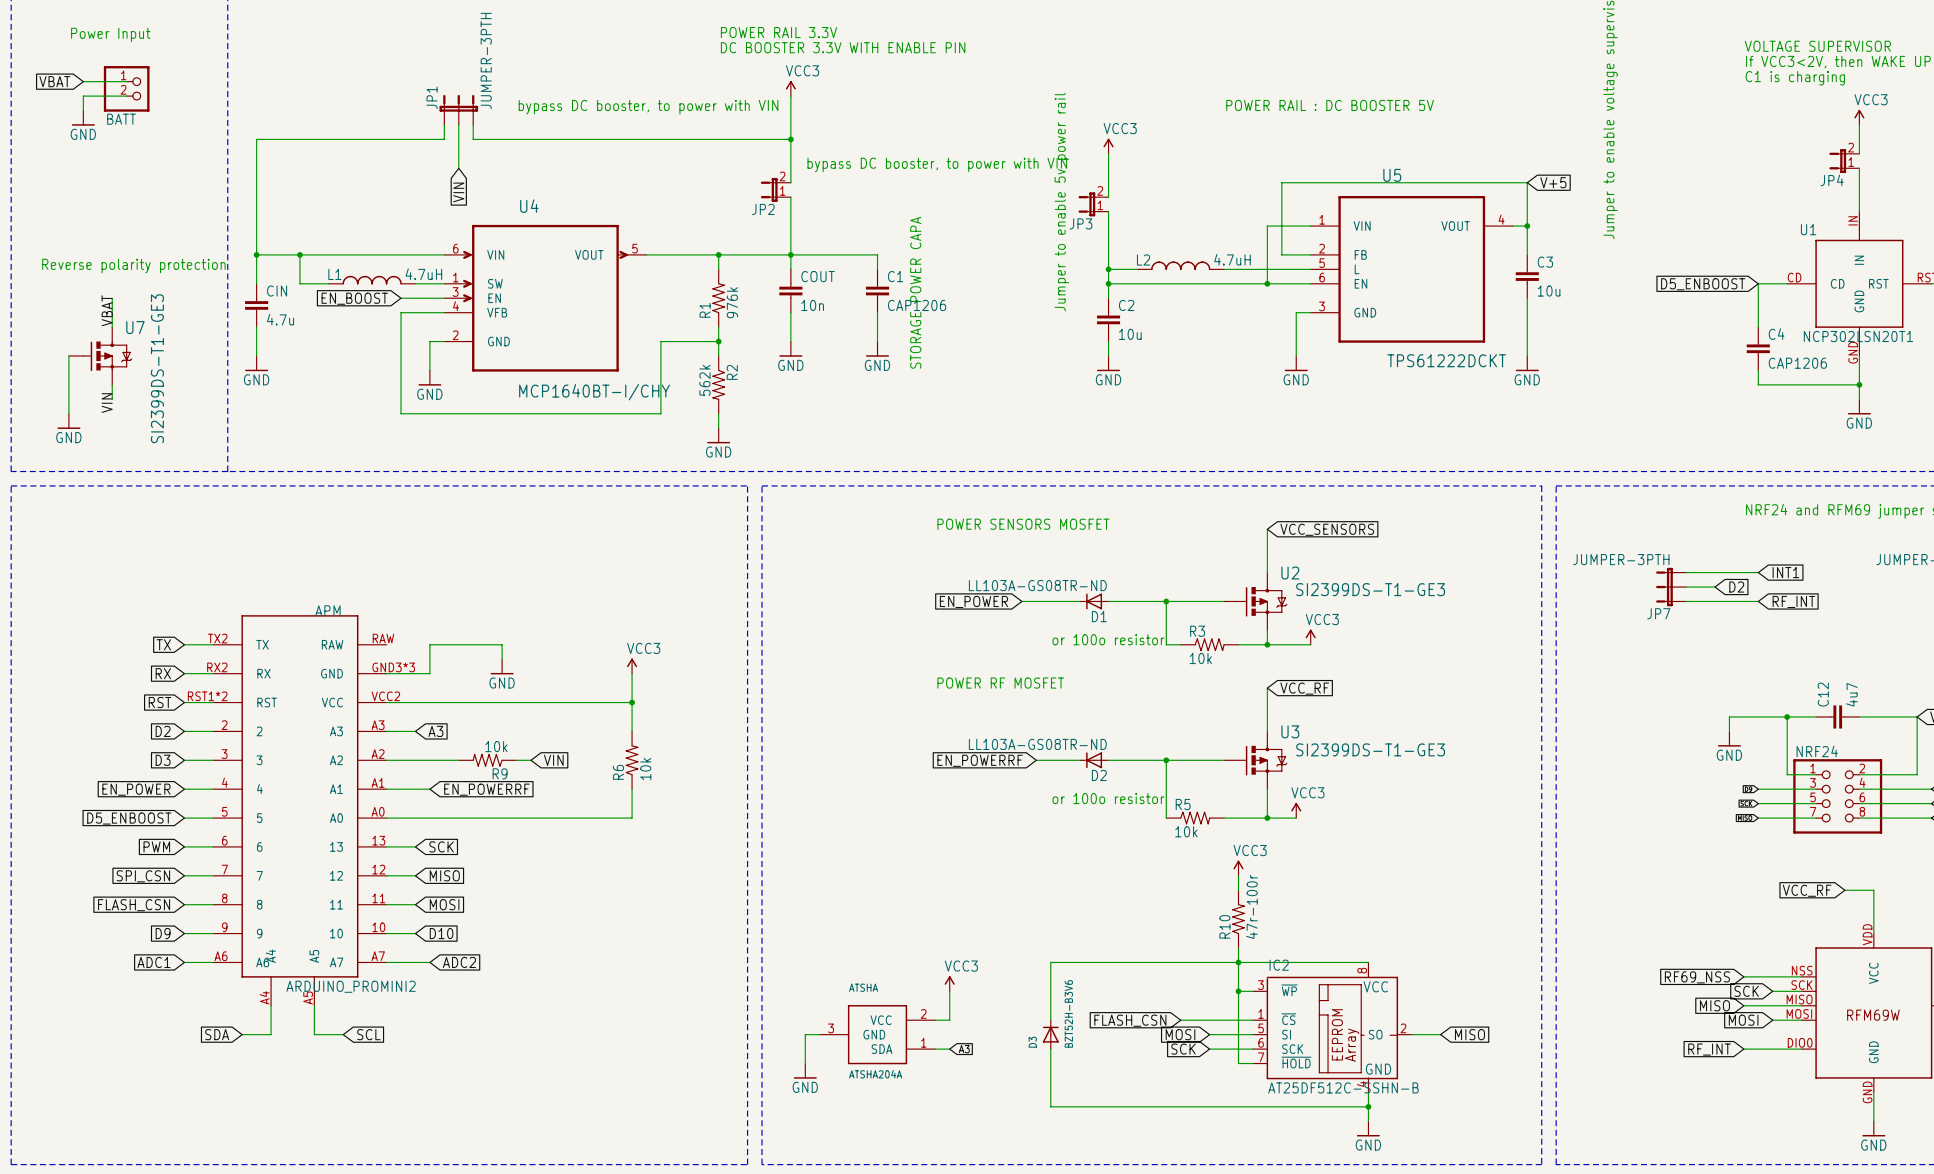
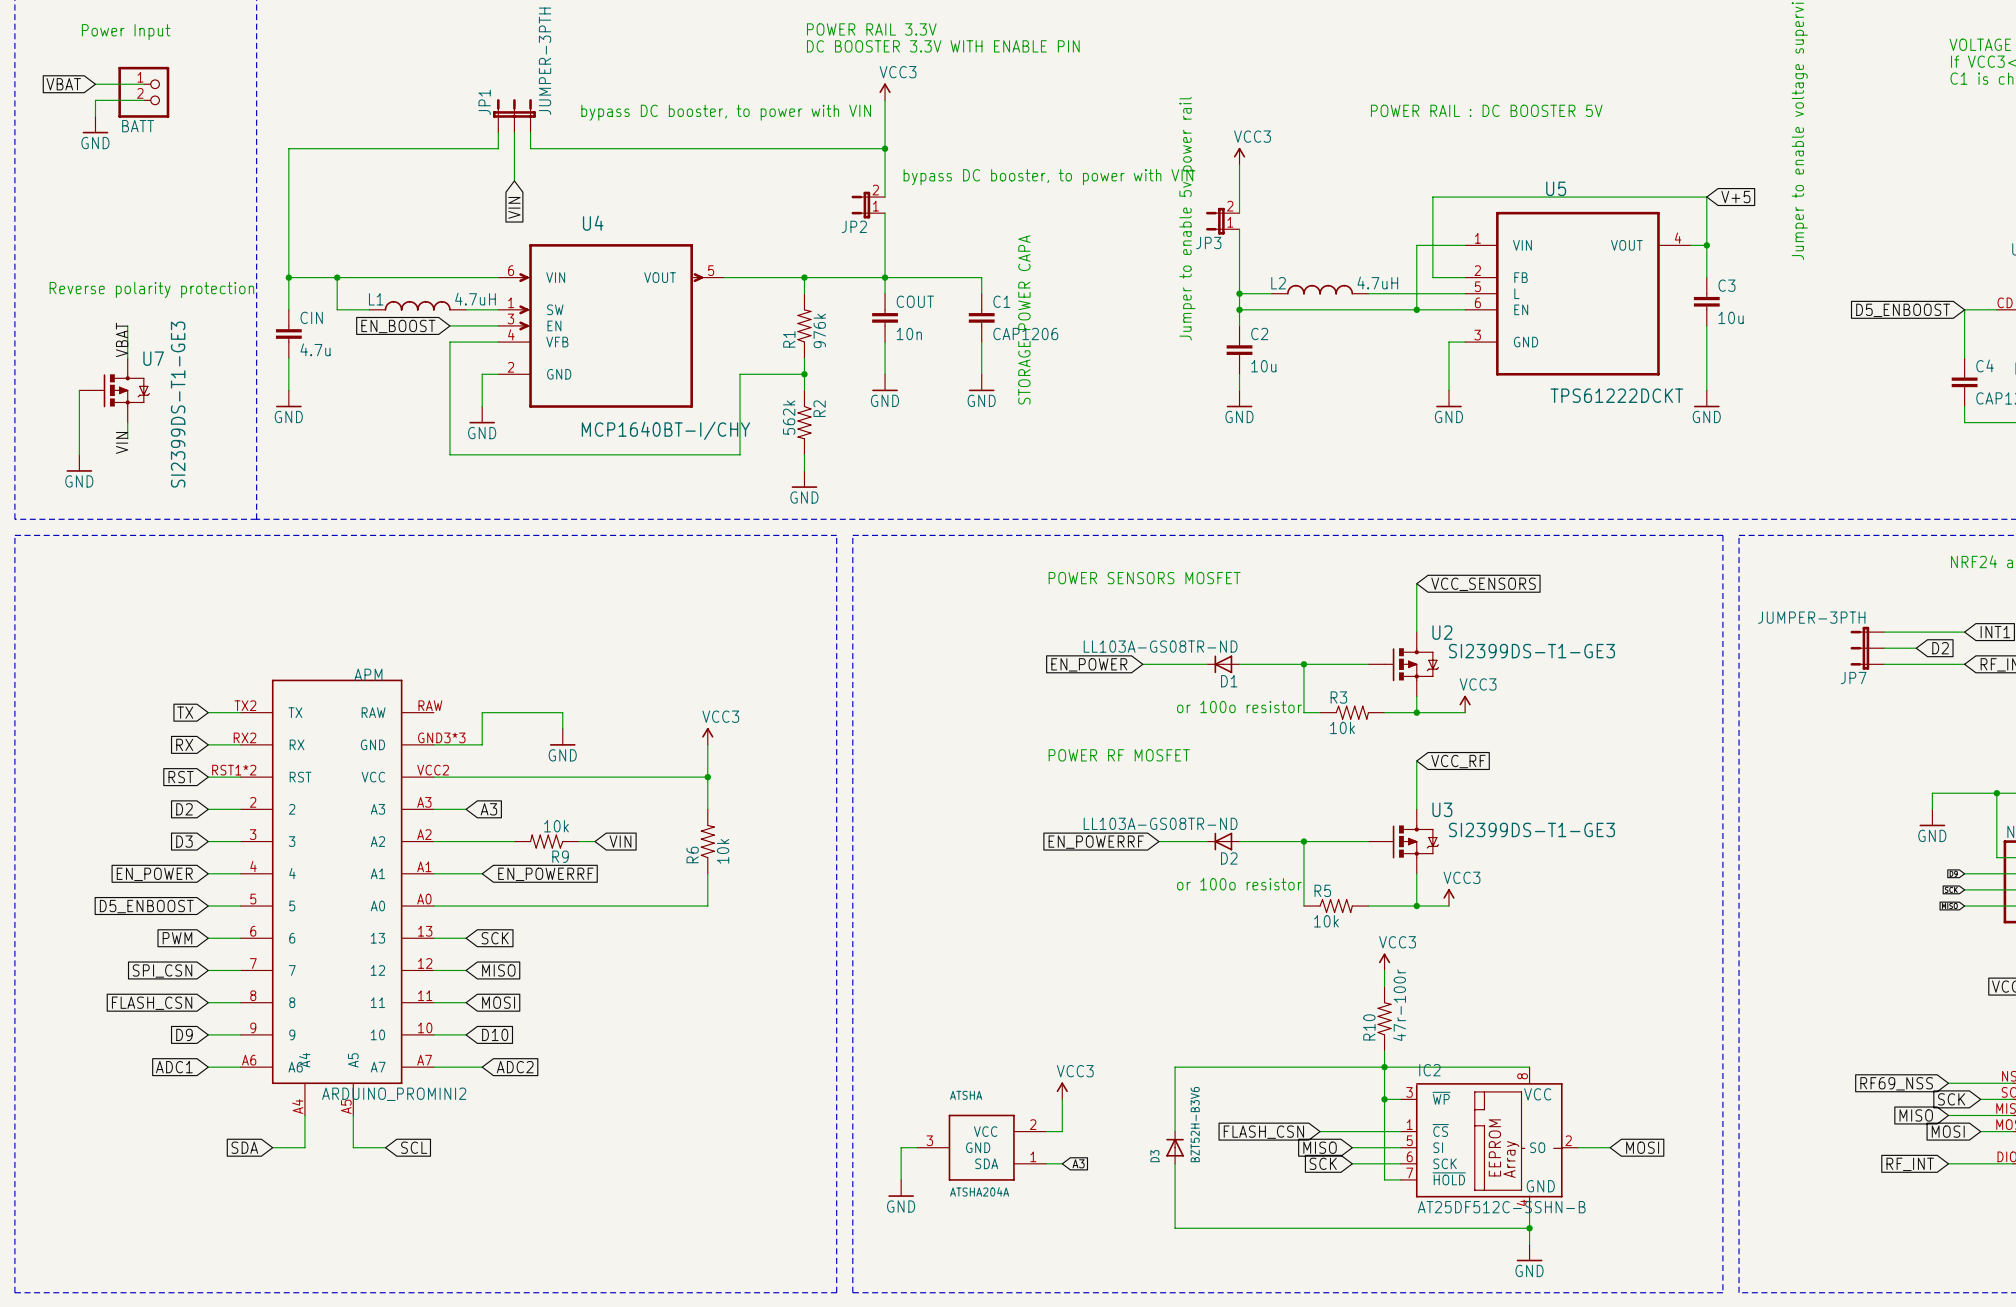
global label: MOSI (1180, 1034) -> MISO (1320, 1147)
global label: MISO (1469, 1034) -> MOSI (1642, 1147)

